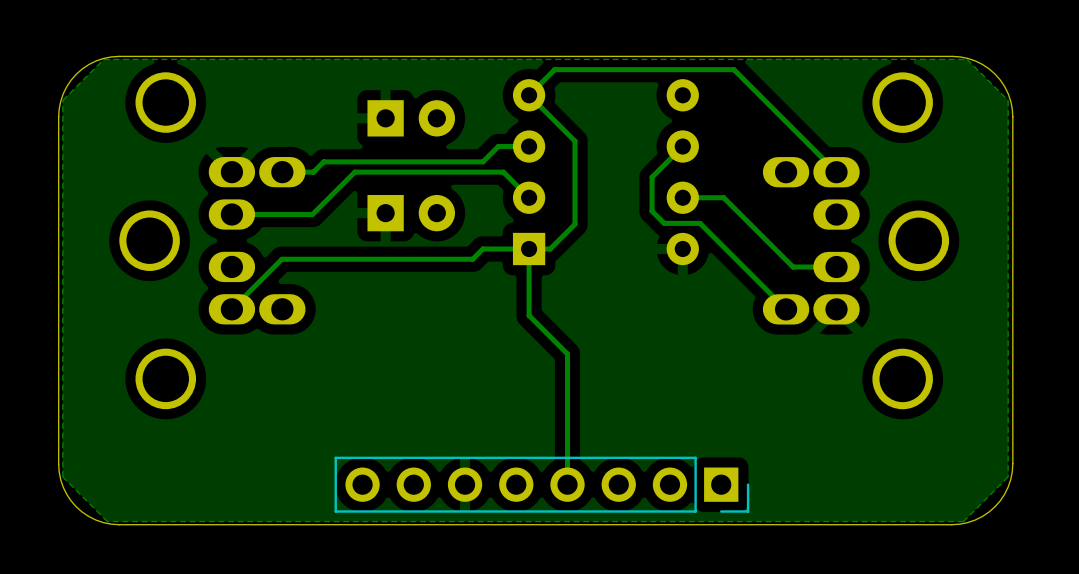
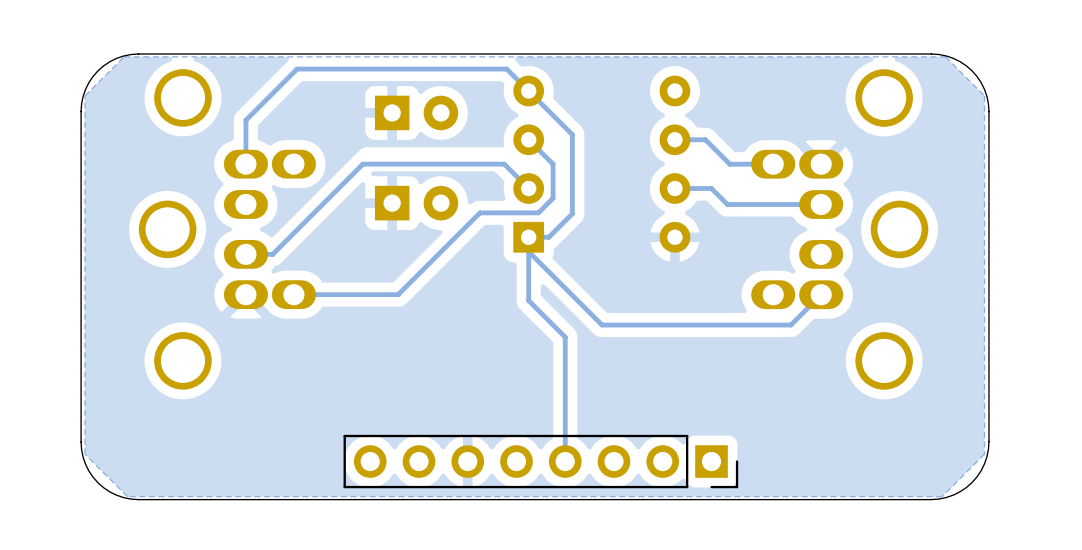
track: (529, 95) (554, 69) (733, 69) (836, 172) -> (528, 91) (506, 69) (297, 69) (245, 120) (245, 164)
track: (529, 146) (498, 146) (482, 161) (323, 161) (313, 172) (282, 172) -> (528, 139) (553, 164) (553, 198) (538, 212) (479, 212) (398, 294) (293, 294)
track: (682, 146) (652, 177) (652, 211) (664, 223) (700, 223) (786, 309) -> (674, 139) (705, 139) (729, 164) (773, 164)
track: (721, 197) (723, 197) (793, 267) (836, 267) -> (711, 188) (727, 204) (821, 204)
track: (312, 214) (231, 214) -> (322, 204) (272, 254) (245, 254)
track: (529, 248) (482, 248) (472, 259) (281, 259) (231, 309) -> none
track: none -> (528, 251) (602, 325) (790, 325) (821, 294)

